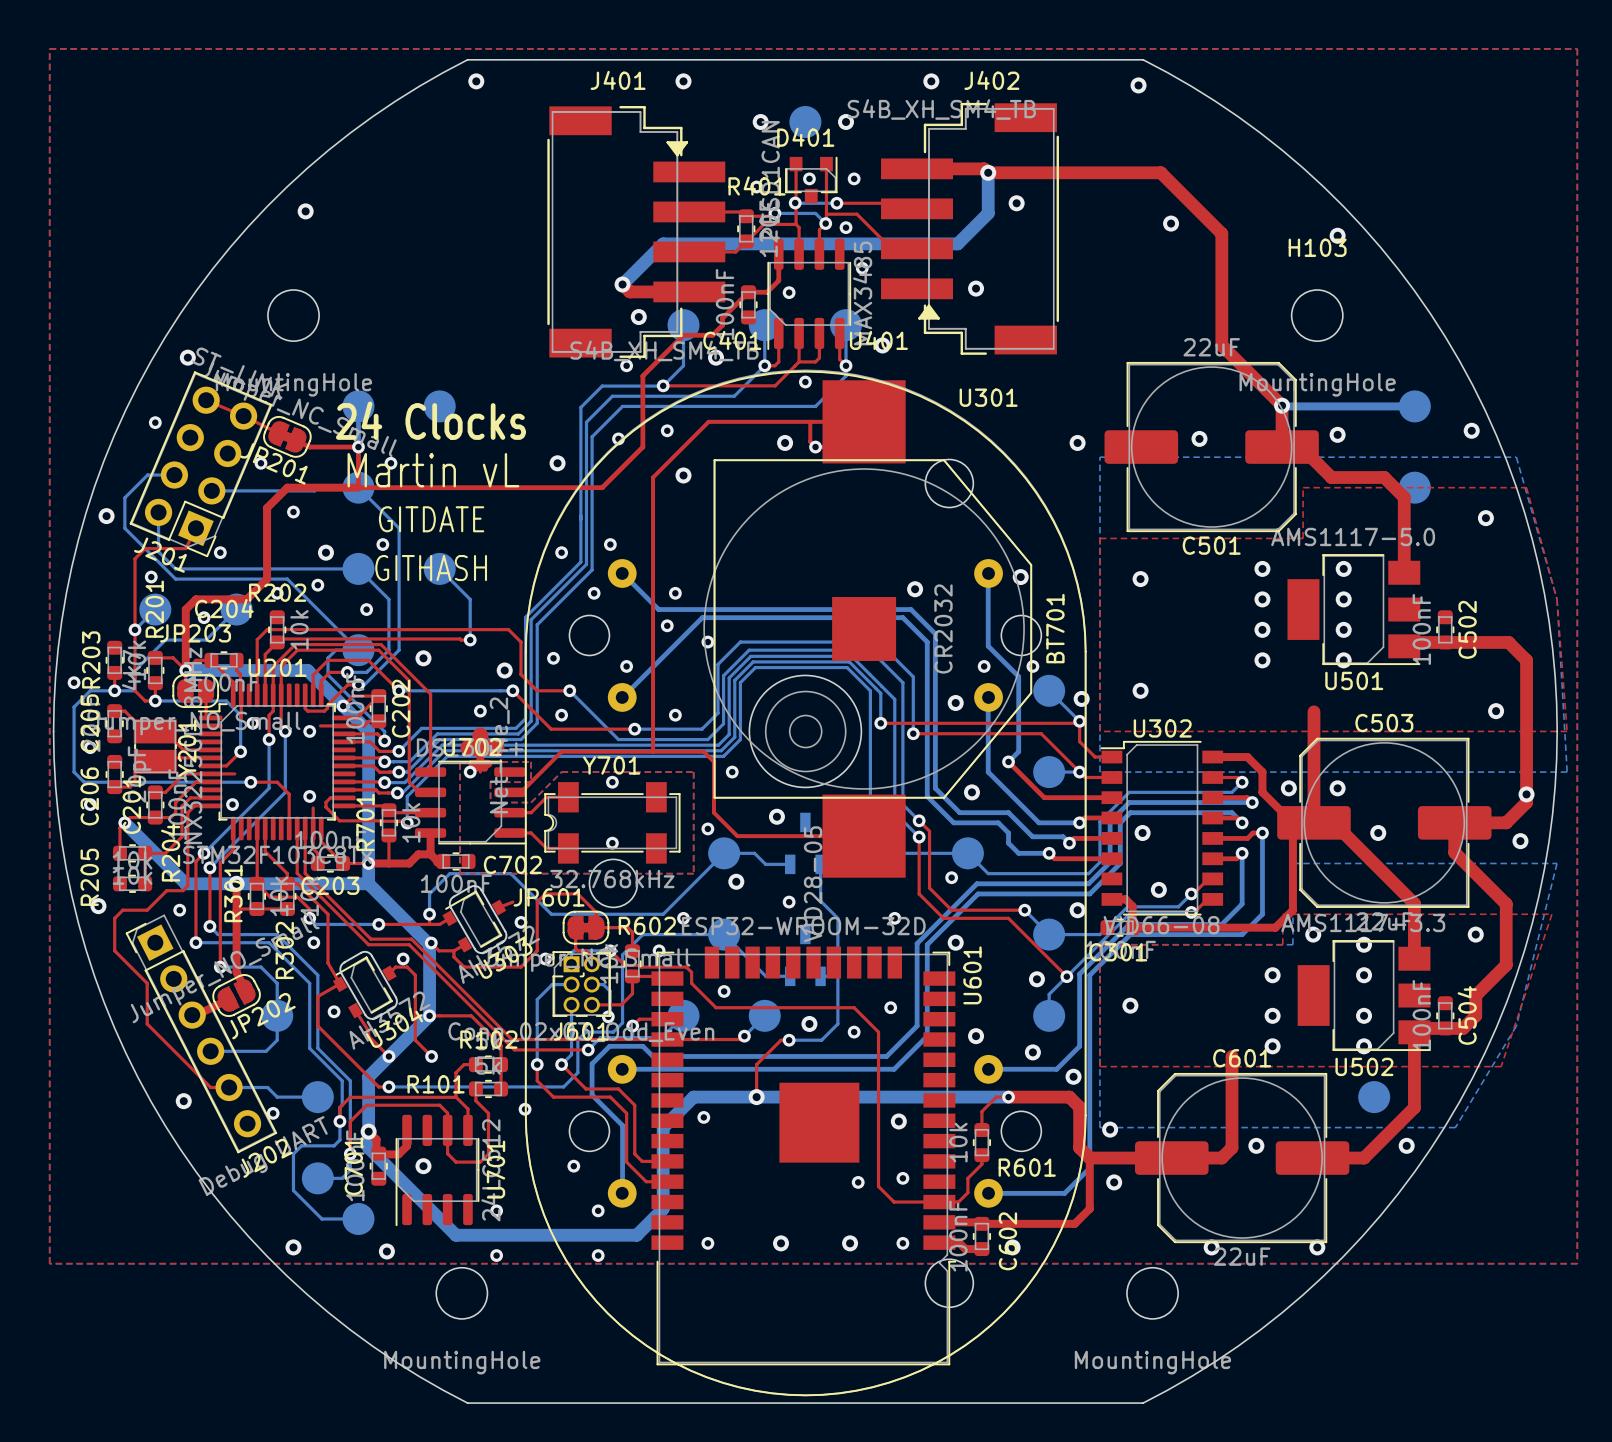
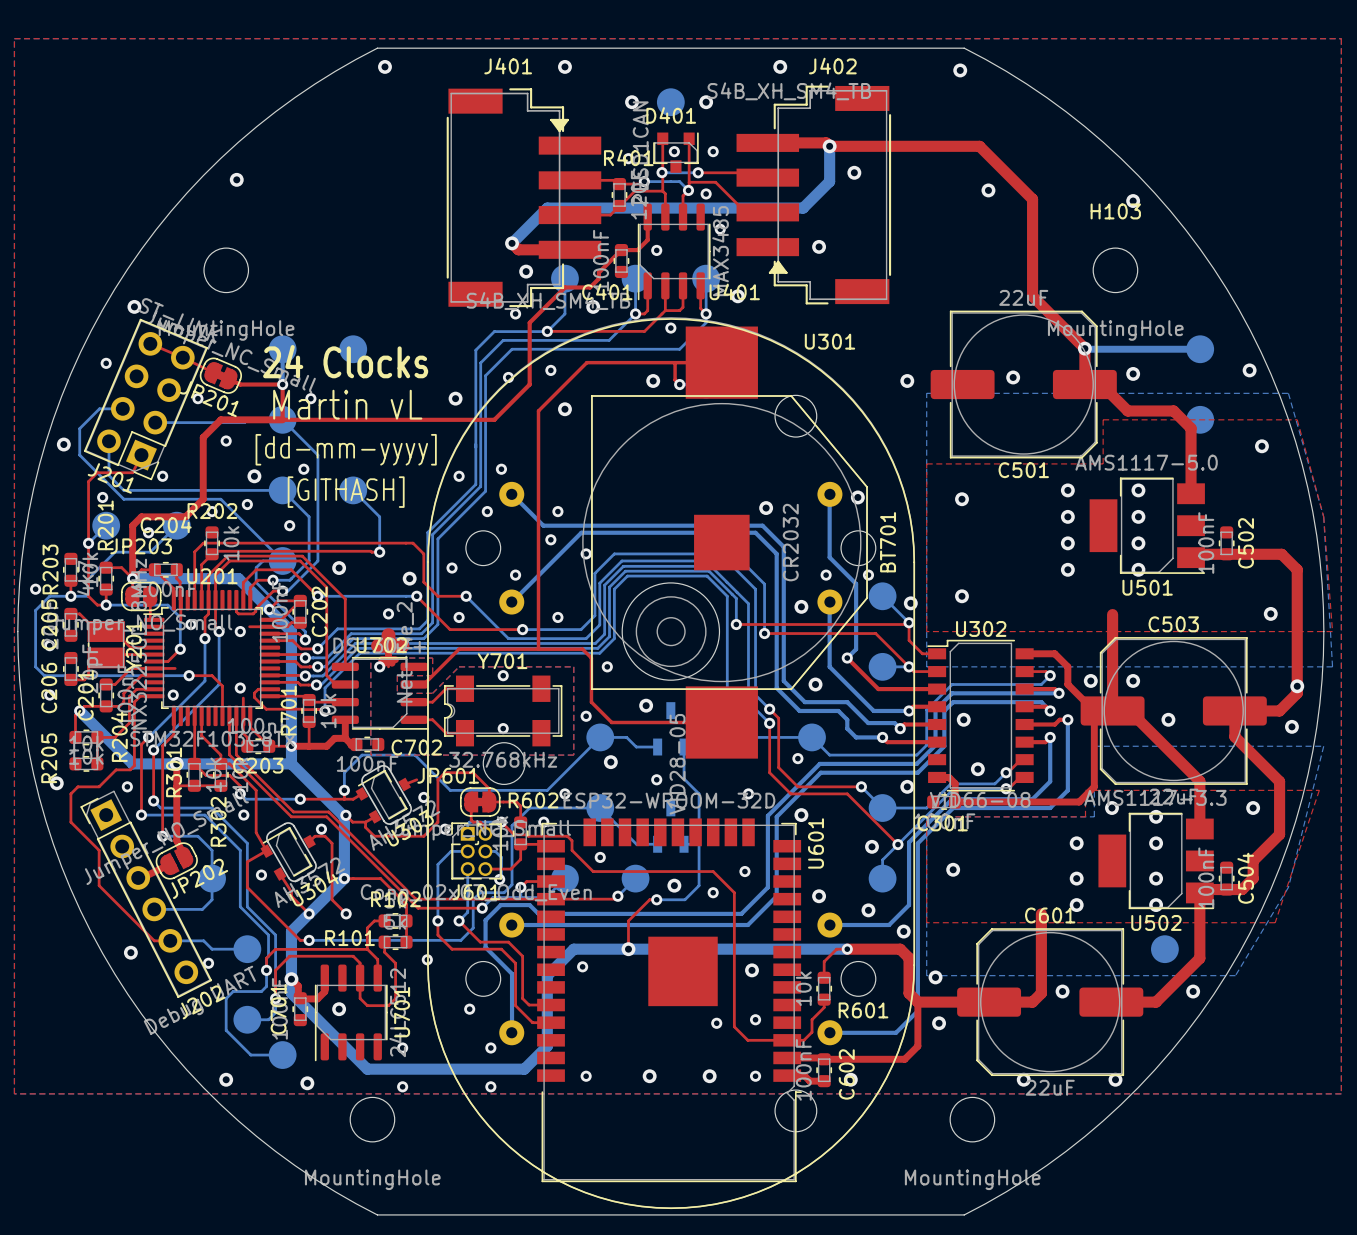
text: GITDATE (431, 519) -> [dd-mm-yyyy] (346, 449)
text: GITHASH (431, 568) -> [GITHASH] (346, 492)

